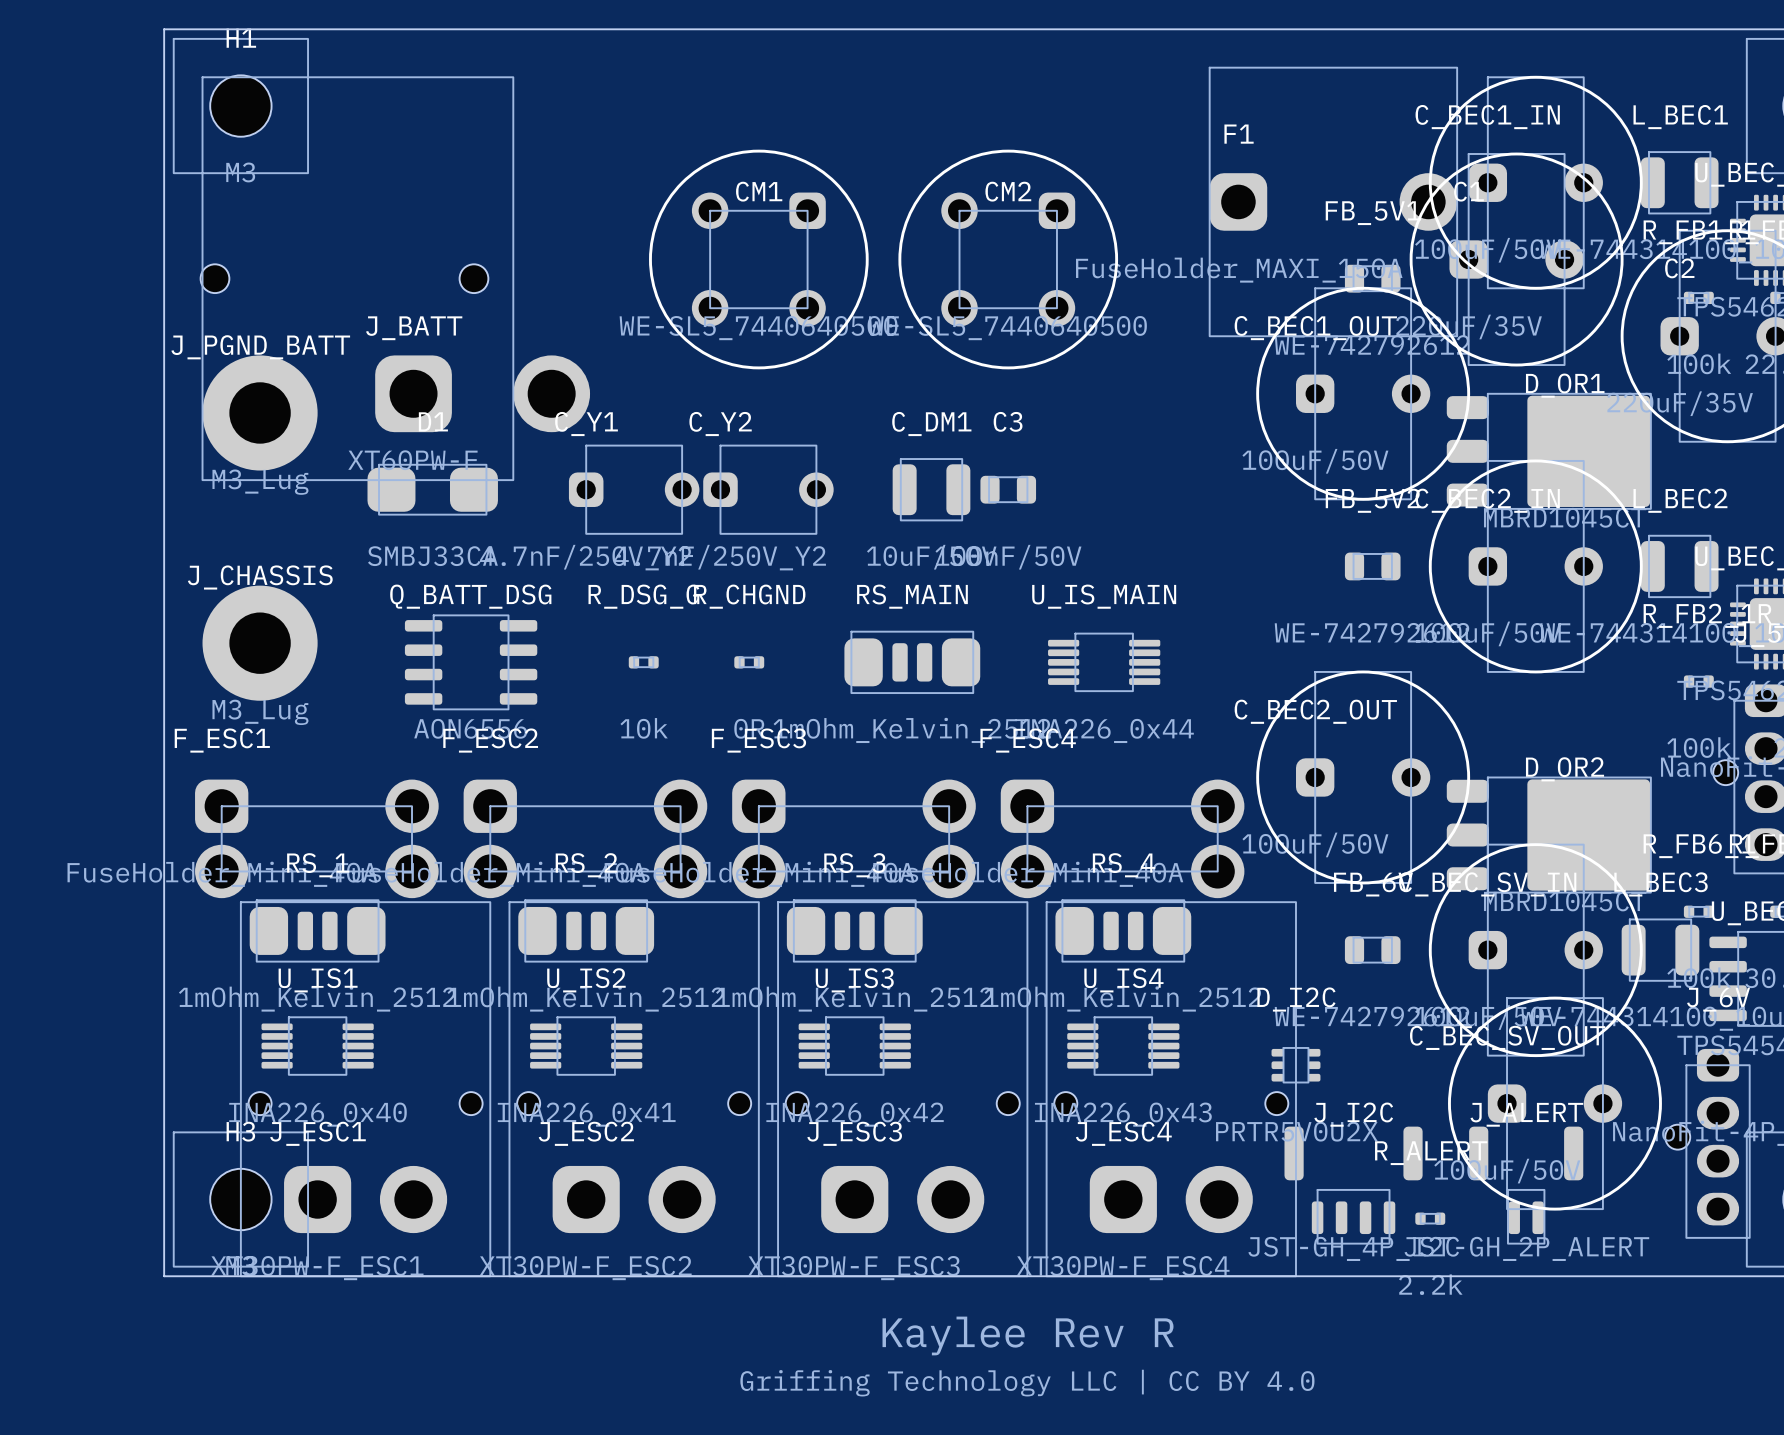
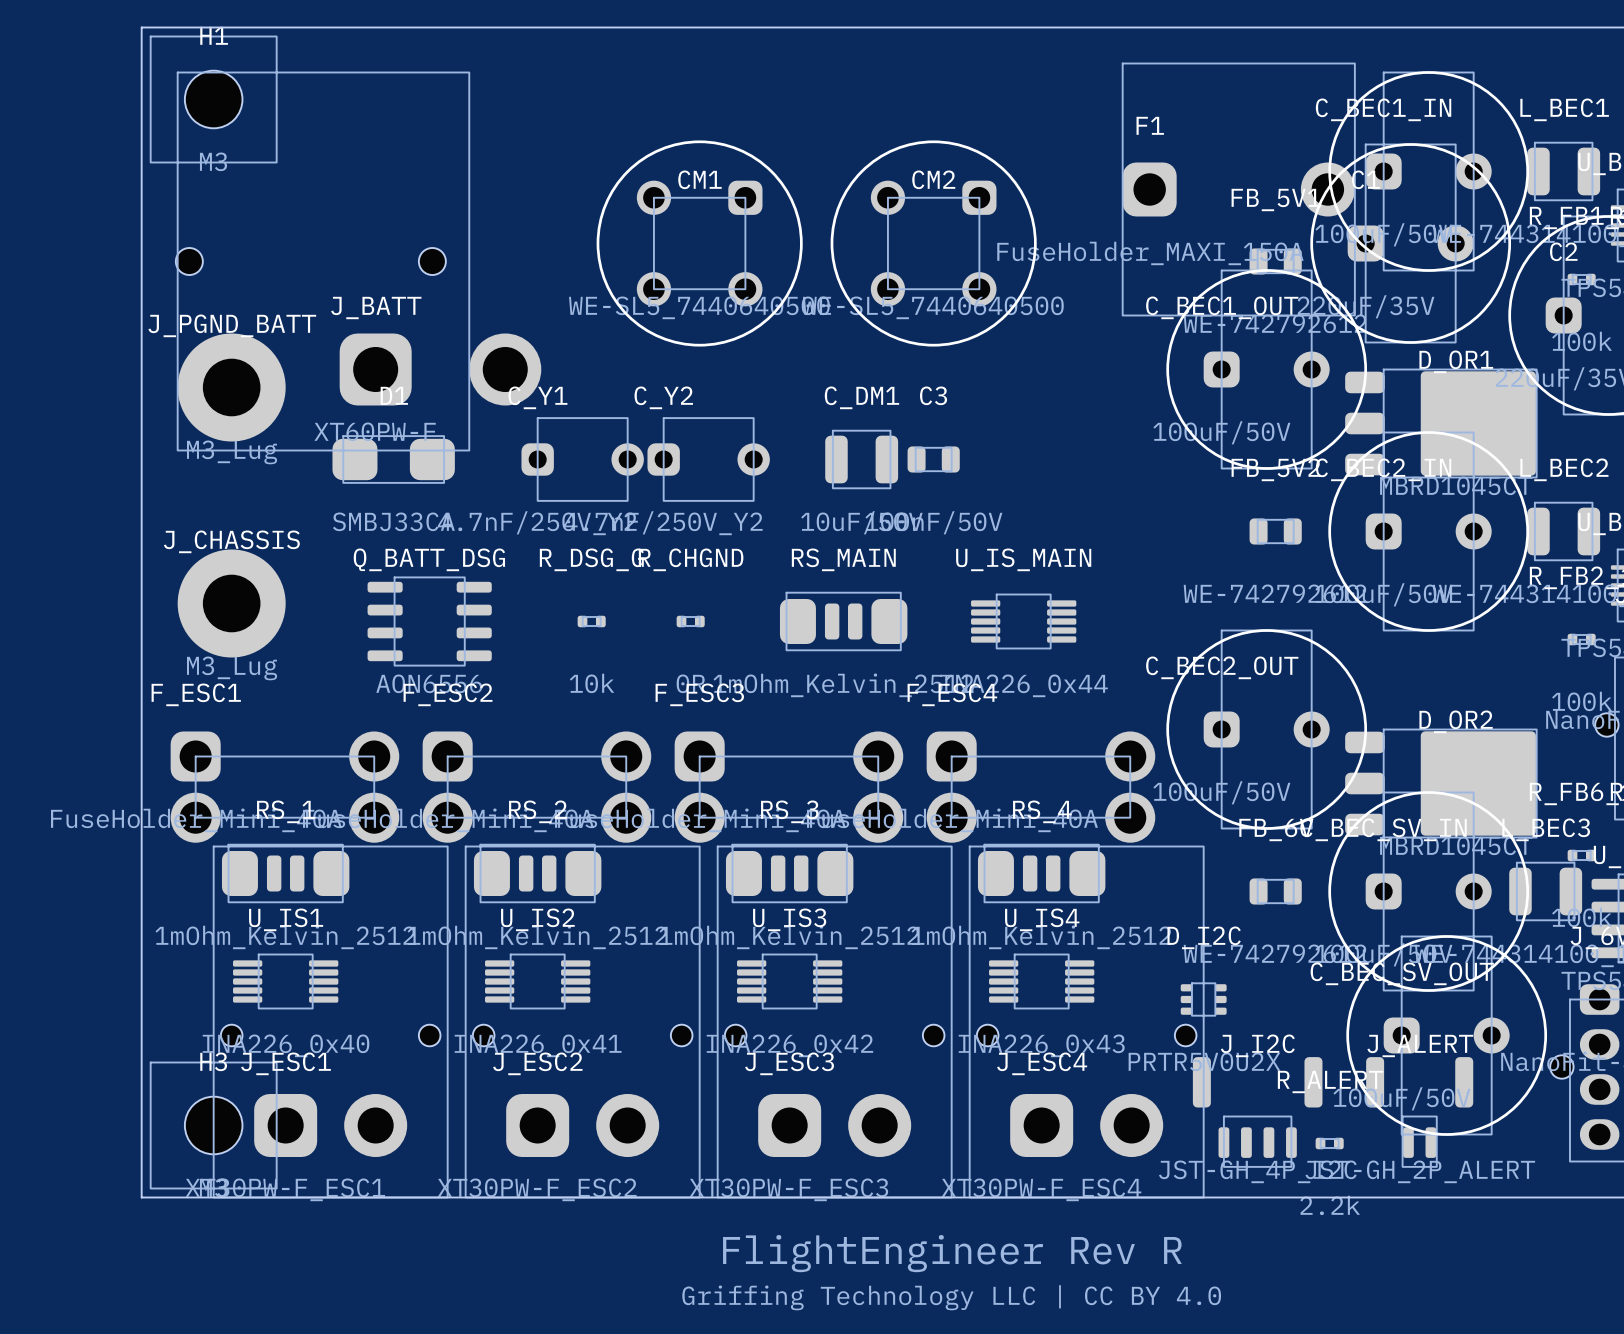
text: Kaylee Rev R (1028, 1335) -> FlightEngineer Rev R (952, 1253)

